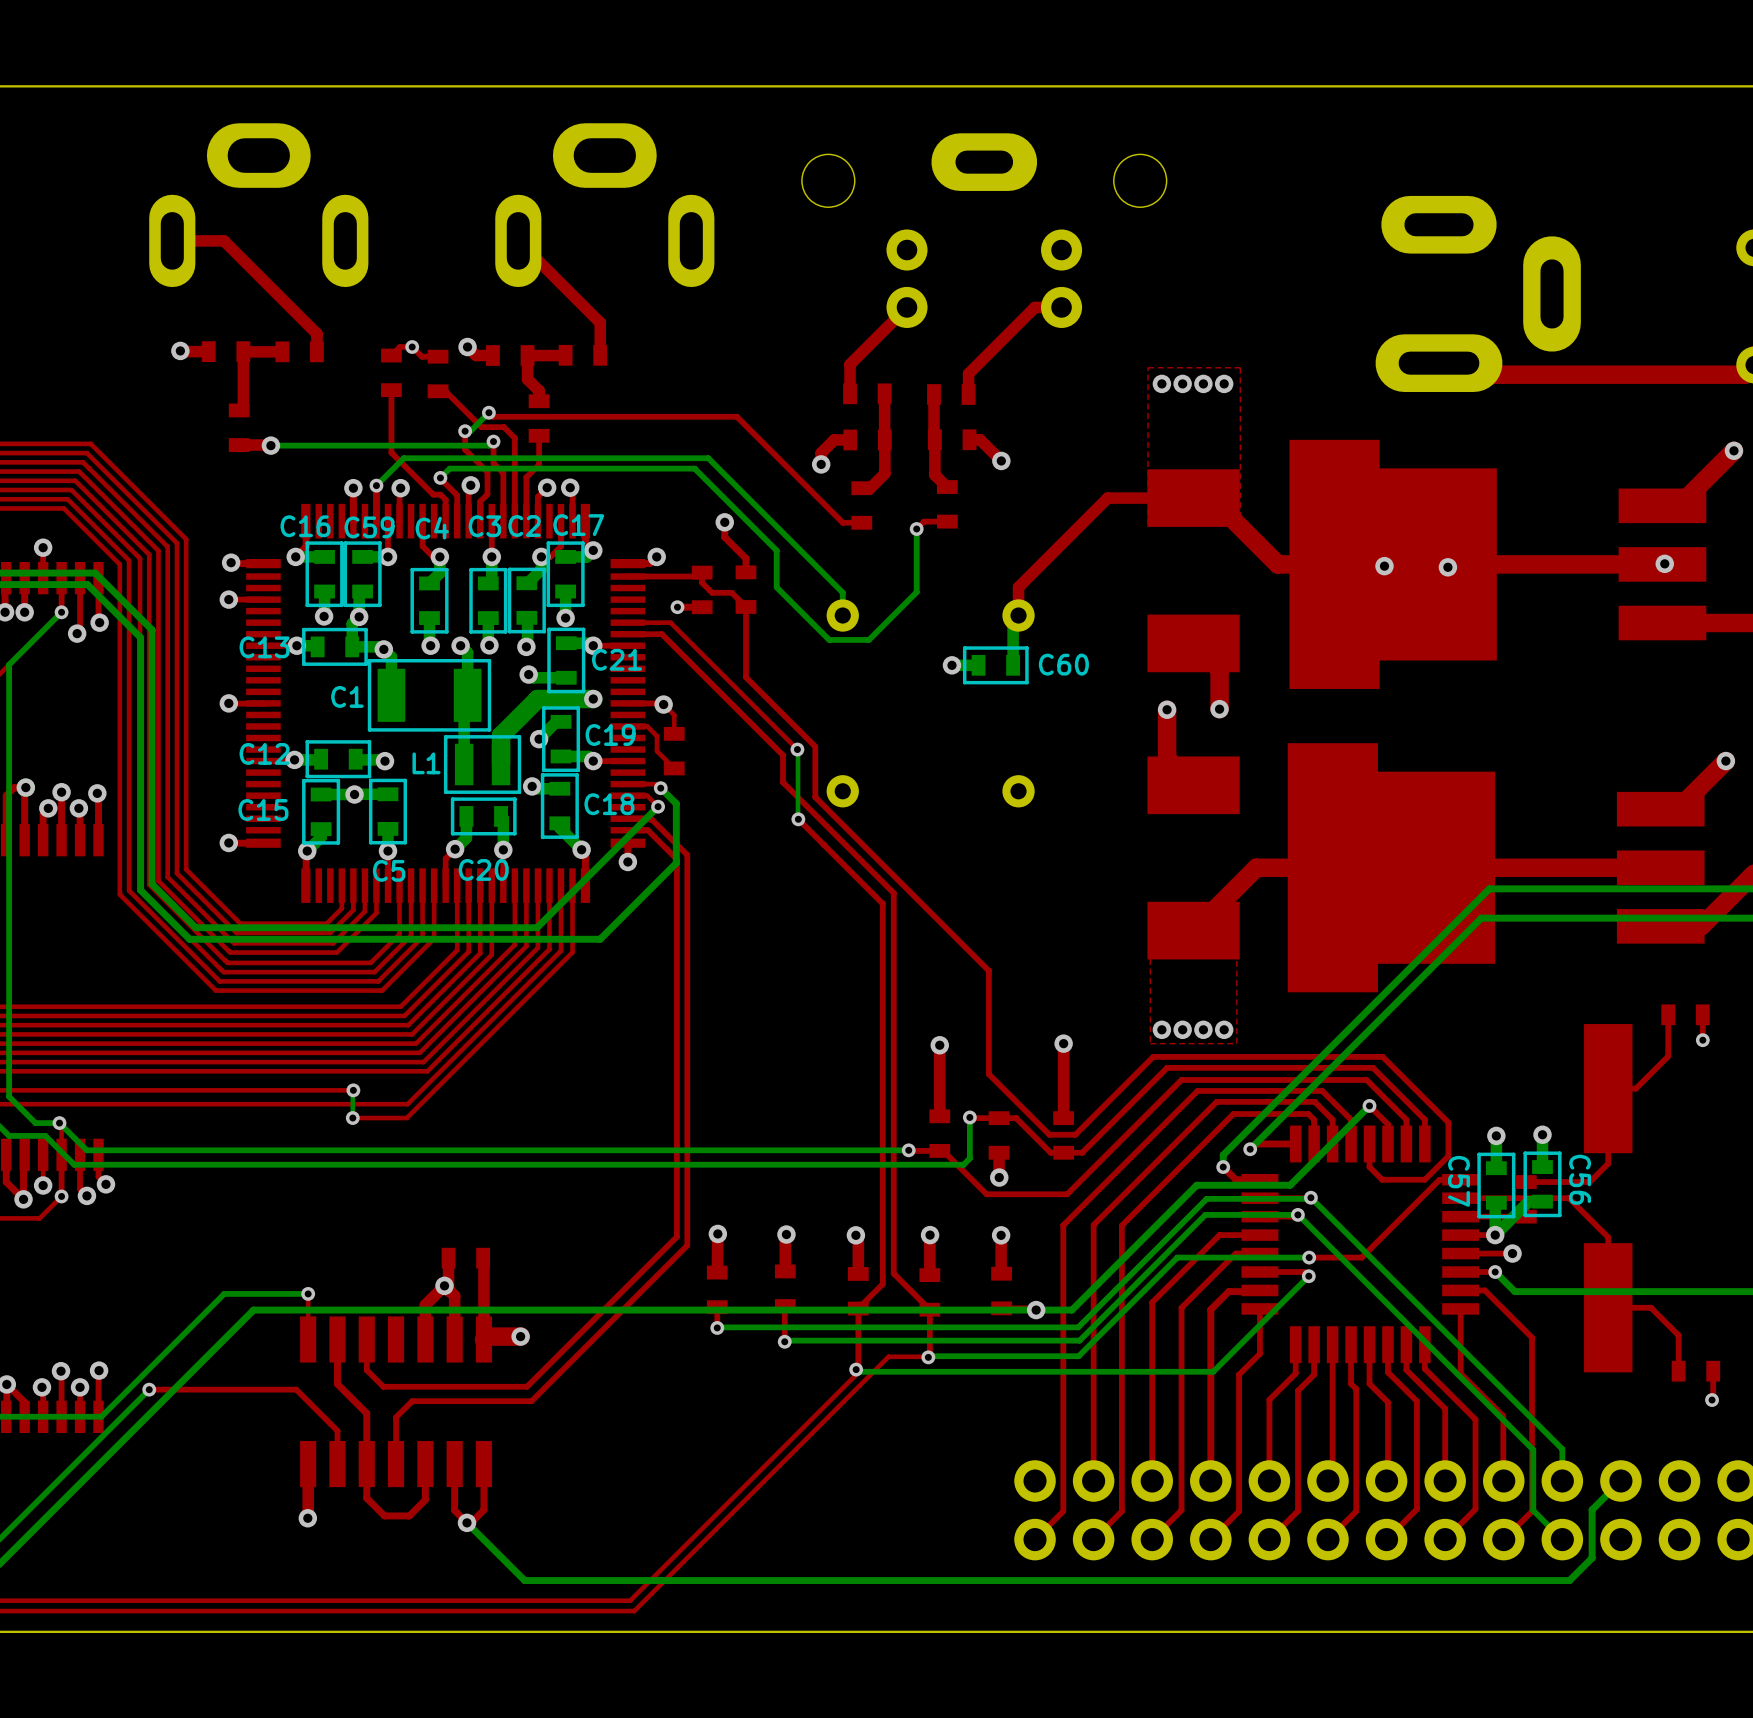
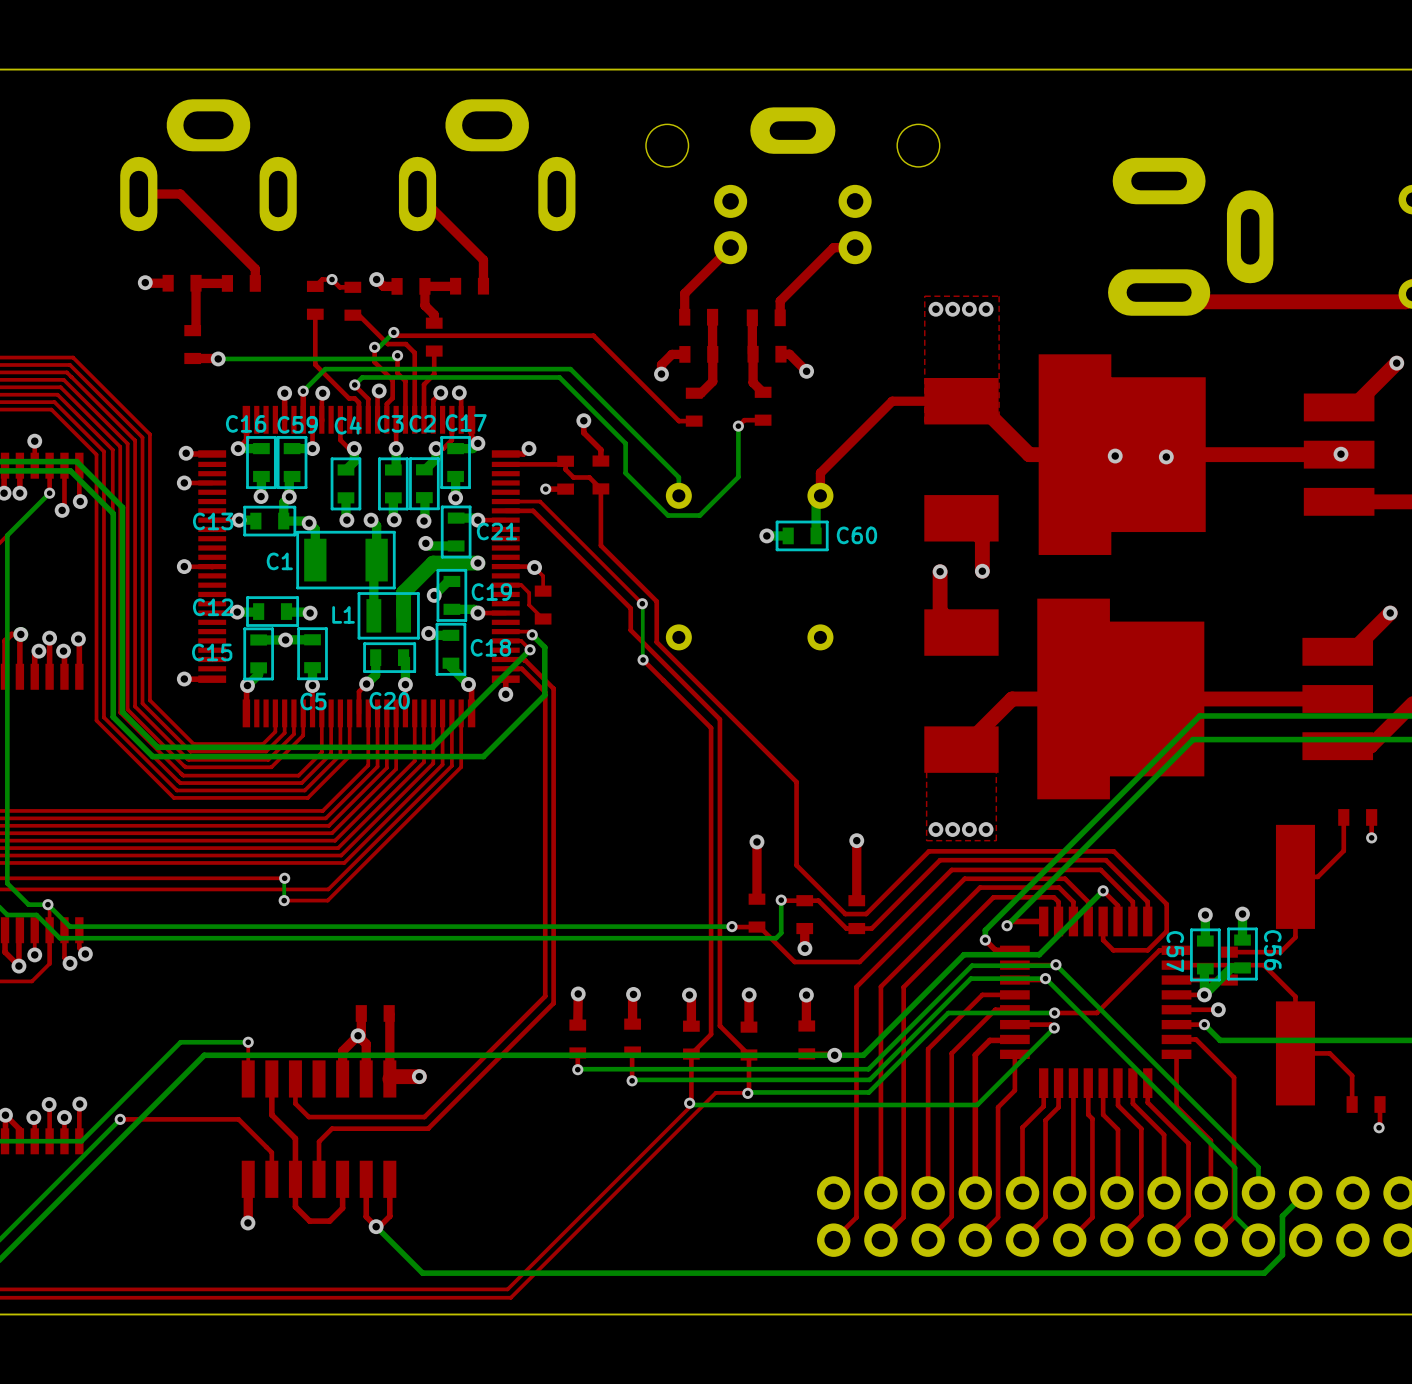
via: (61, 1196) -> none

